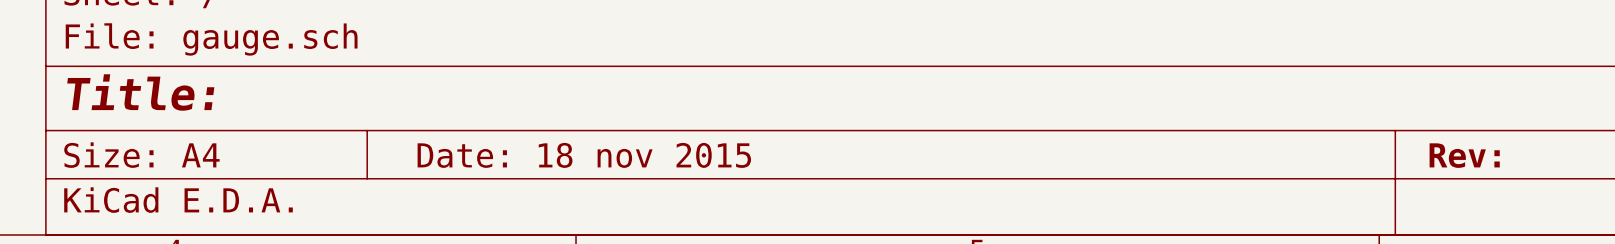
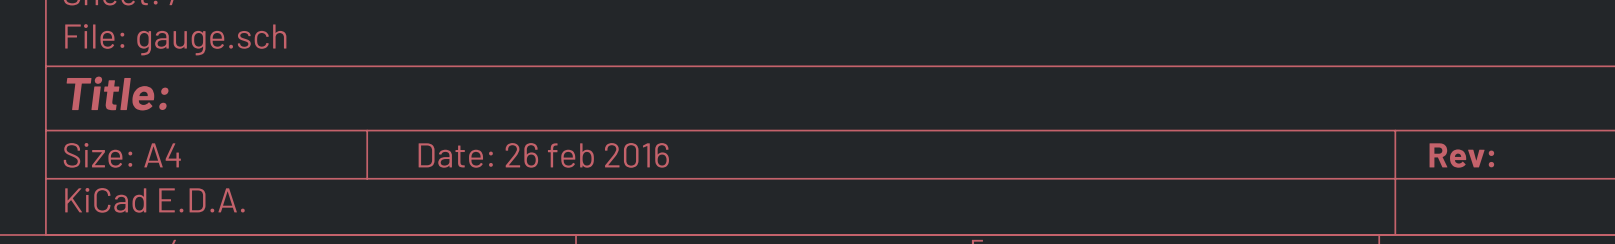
title block: Date: 18 nov 2015 (584, 155) -> Date: 26 feb 2016 (543, 155)

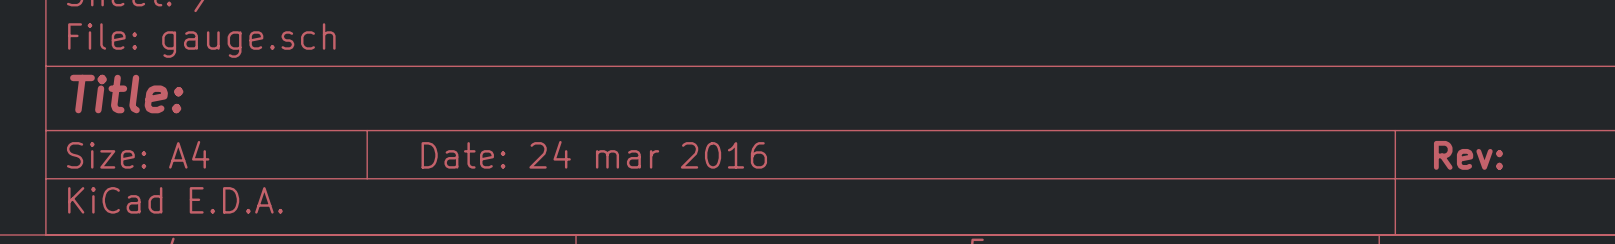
title block: Date: 26 feb 2016 (543, 155) -> Date: 24 mar 2016 (594, 154)

